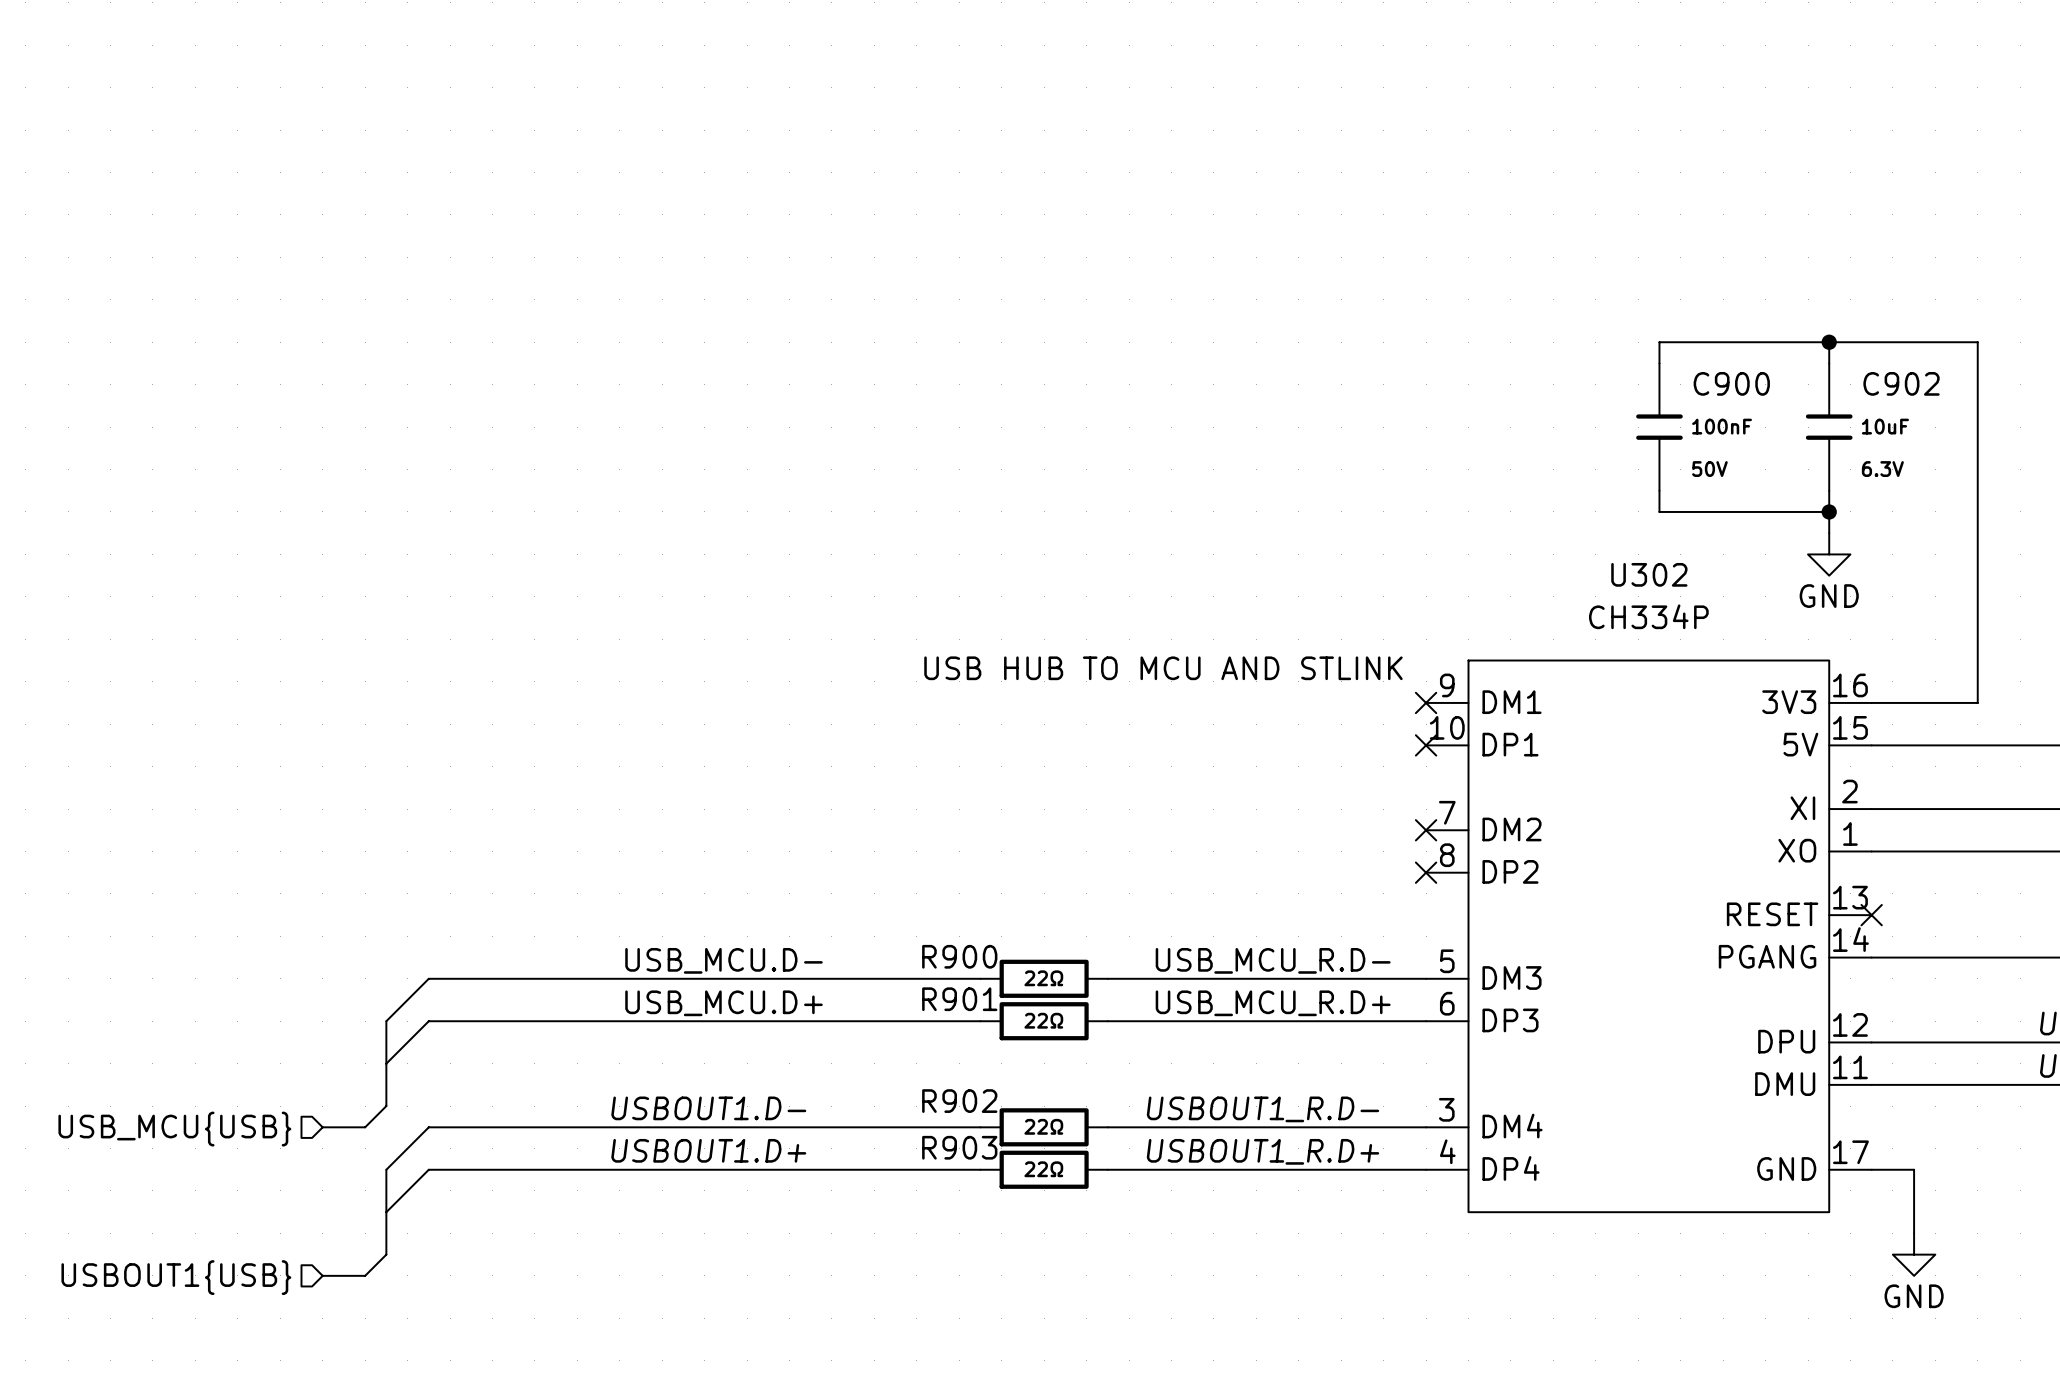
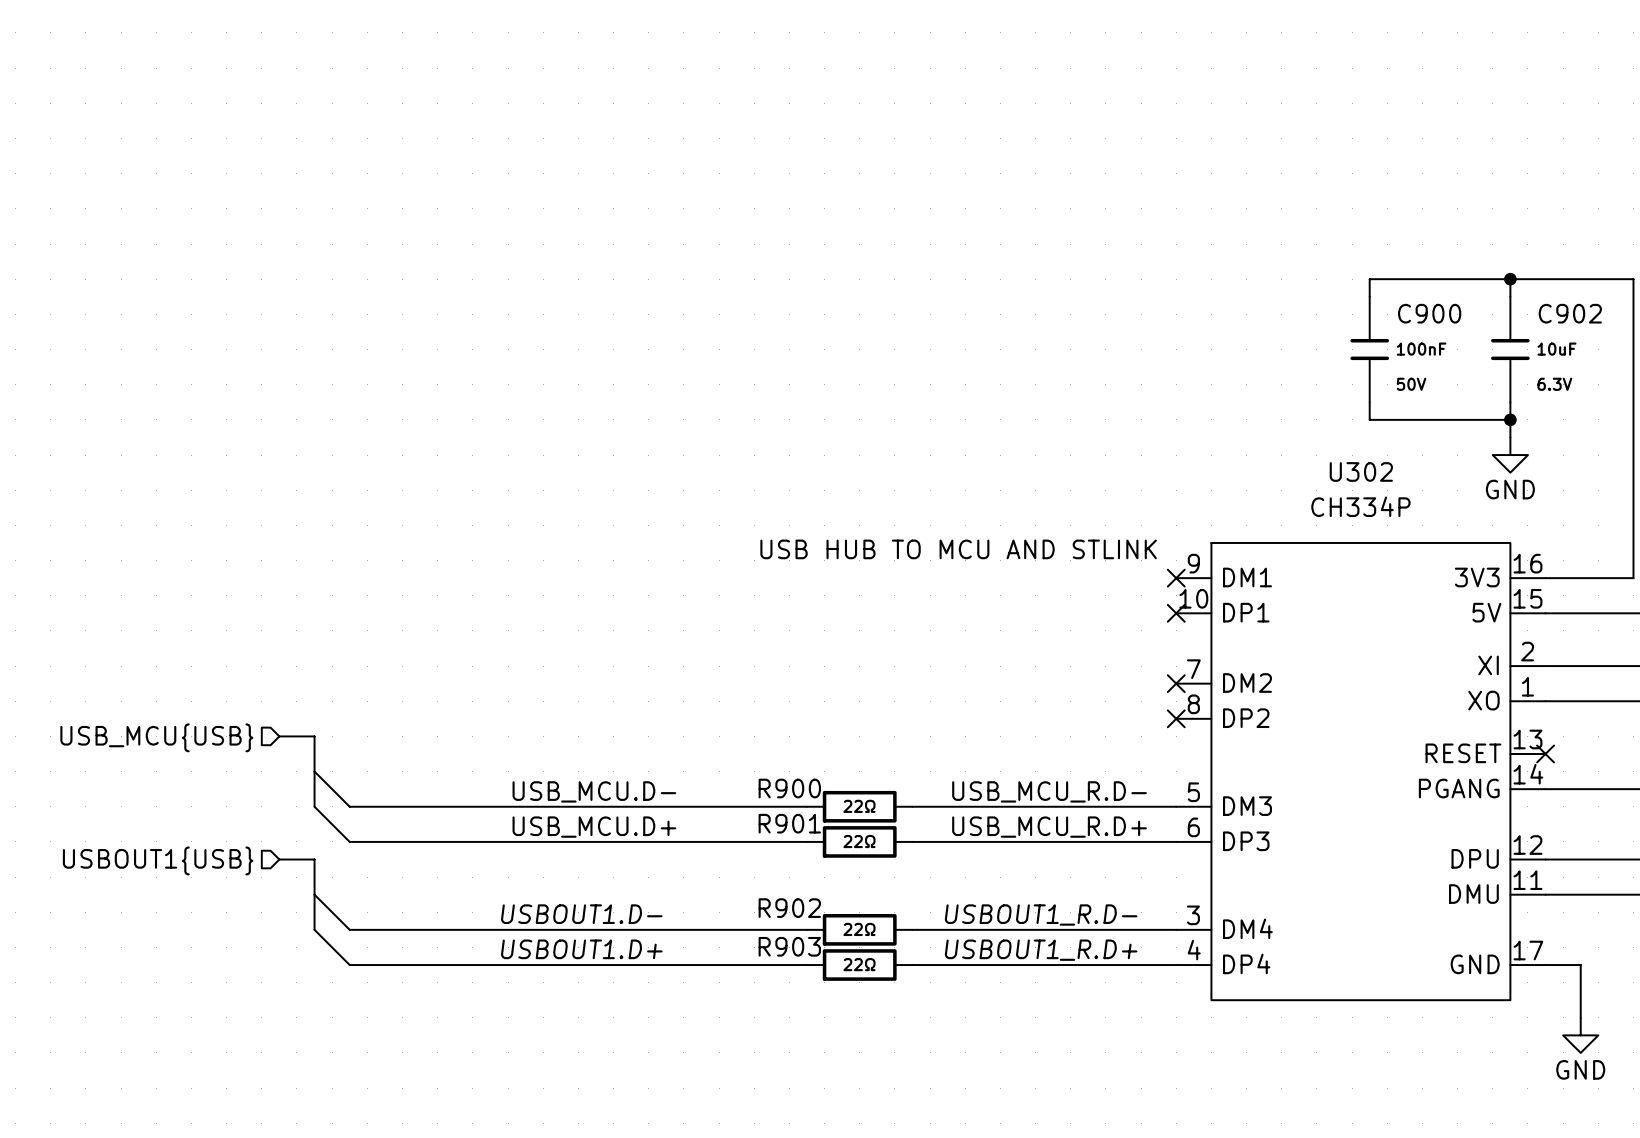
bus: none -> (279, 736) (314, 736) (314, 806)
wire: (428, 978) (386, 1021) -> (349, 806) (314, 771)
bus: (386, 1021) (386, 1042) -> (279, 859) (314, 859)
wire: (428, 1021) (386, 1063) -> (349, 841) (314, 806)
bus: (386, 1106) (365, 1127) (322, 1127) -> (314, 912) (314, 929)
wire: (428, 1127) (386, 1169) -> (349, 929) (314, 894)
hierarchical label position: USB_MCU{USB} (174, 1129) -> USB_MCU{USB} (156, 737)
bus: (386, 1169) (386, 1254) (365, 1275) (322, 1275) -> none
wire: (428, 1169) (386, 1212) -> (349, 965) (314, 929)
hierarchical label position: USBOUT1{USB} (176, 1277) -> USBOUT1{USB} (158, 860)

